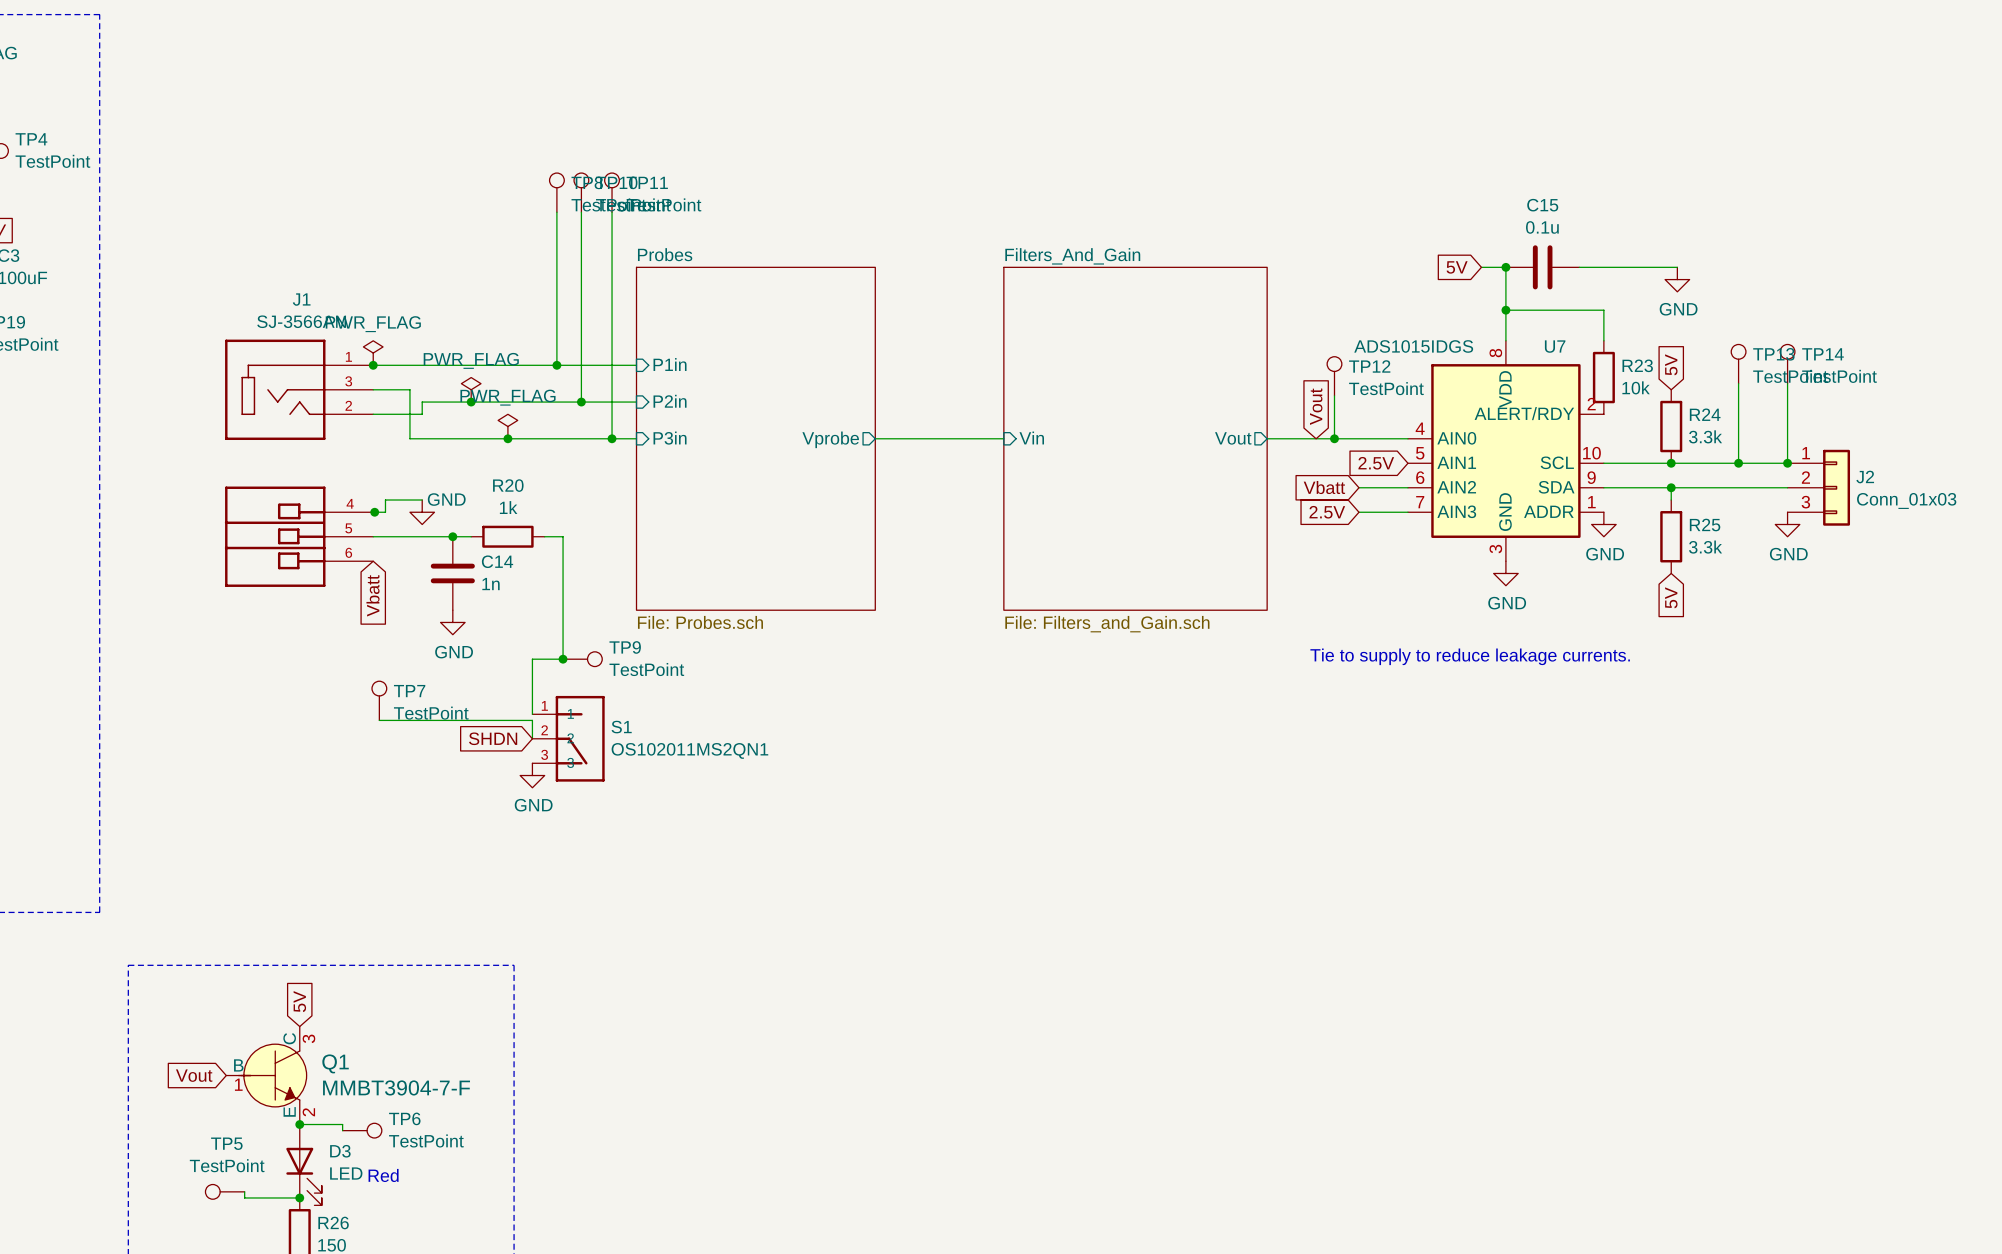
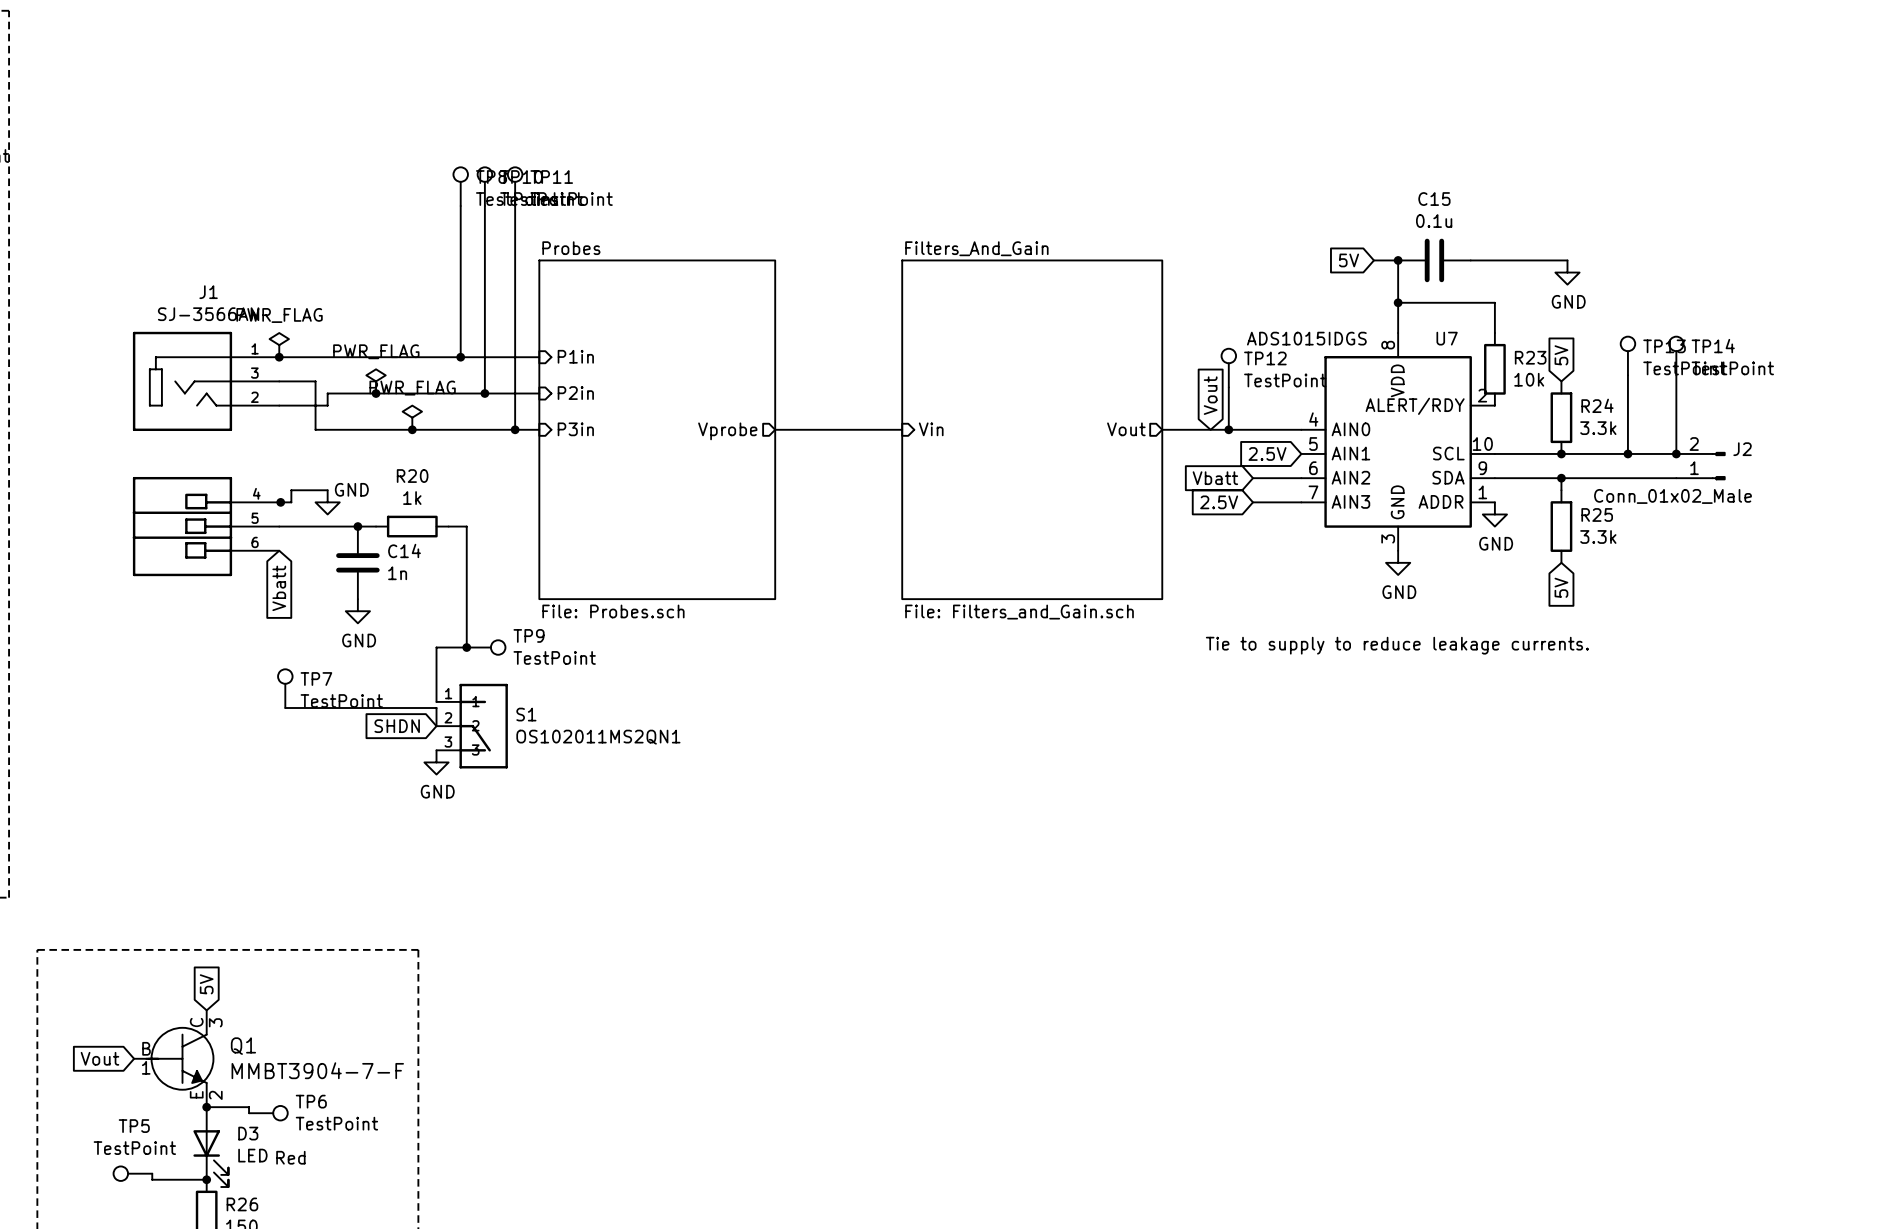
J2 symbol: [1787, 449, 1851, 526] -> [1676, 452, 1726, 481]
J2 value: Conn_01x03 (1906, 500) -> Conn_01x02_Male (1672, 496)
power symbol: GND (1787, 524) -> none

